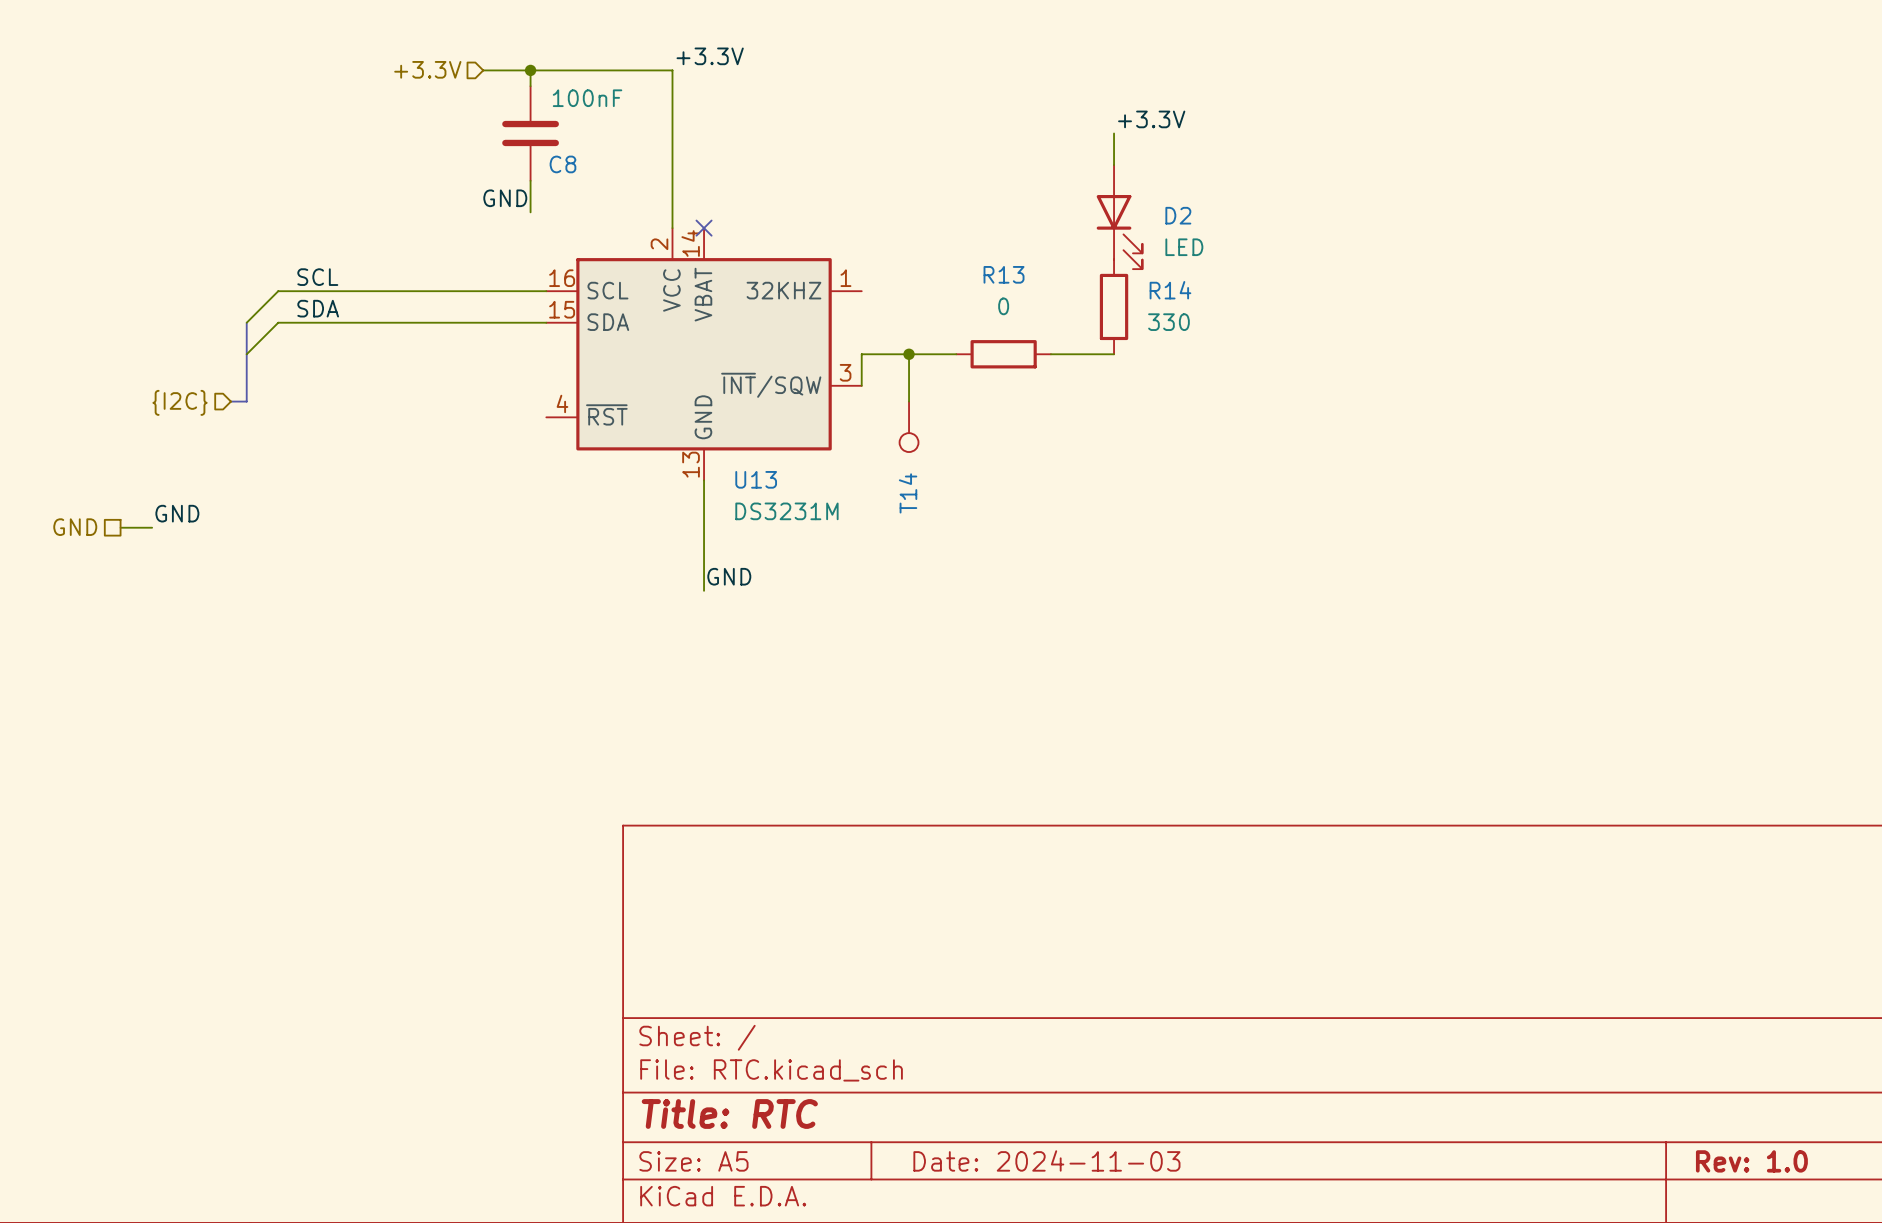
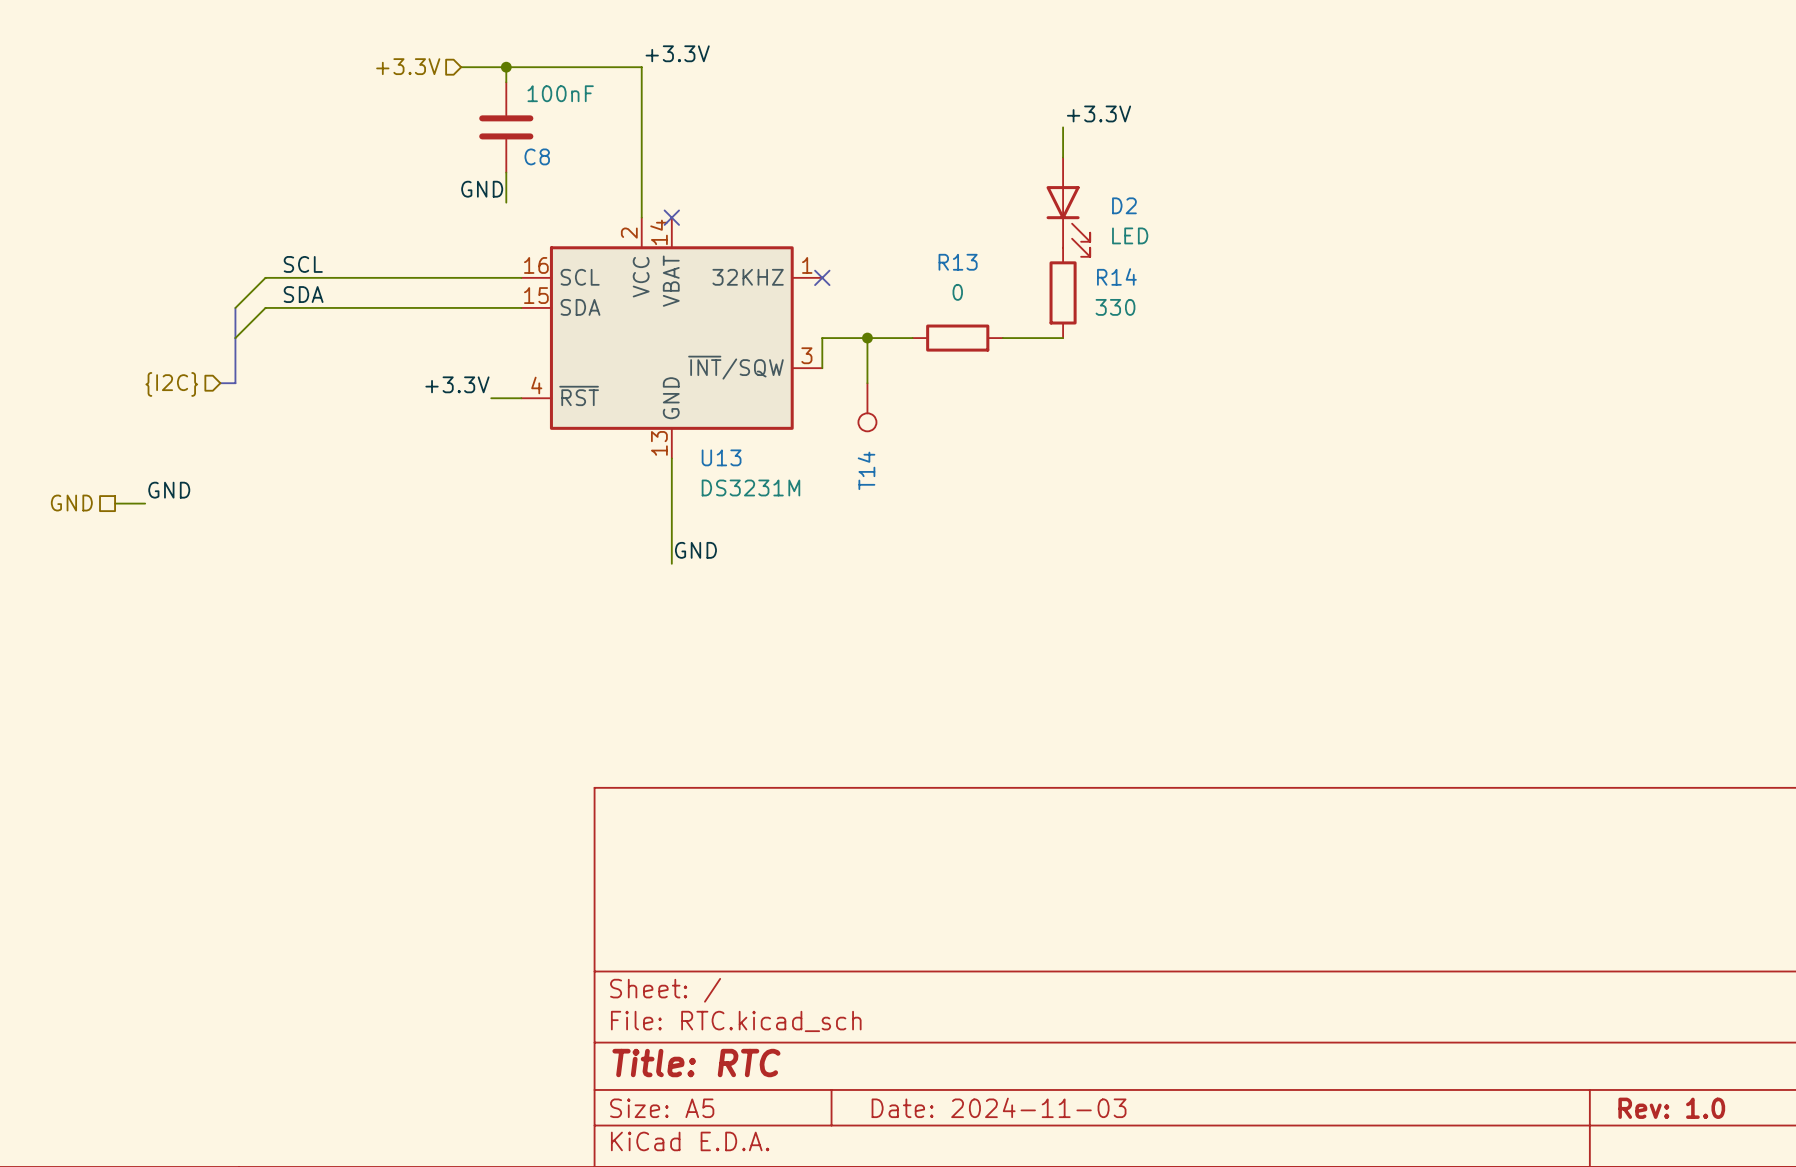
no-connect mark: none -> (822, 277)
label: none -> +3.3V (457, 384)
wire: none -> (491, 398) (521, 398)

